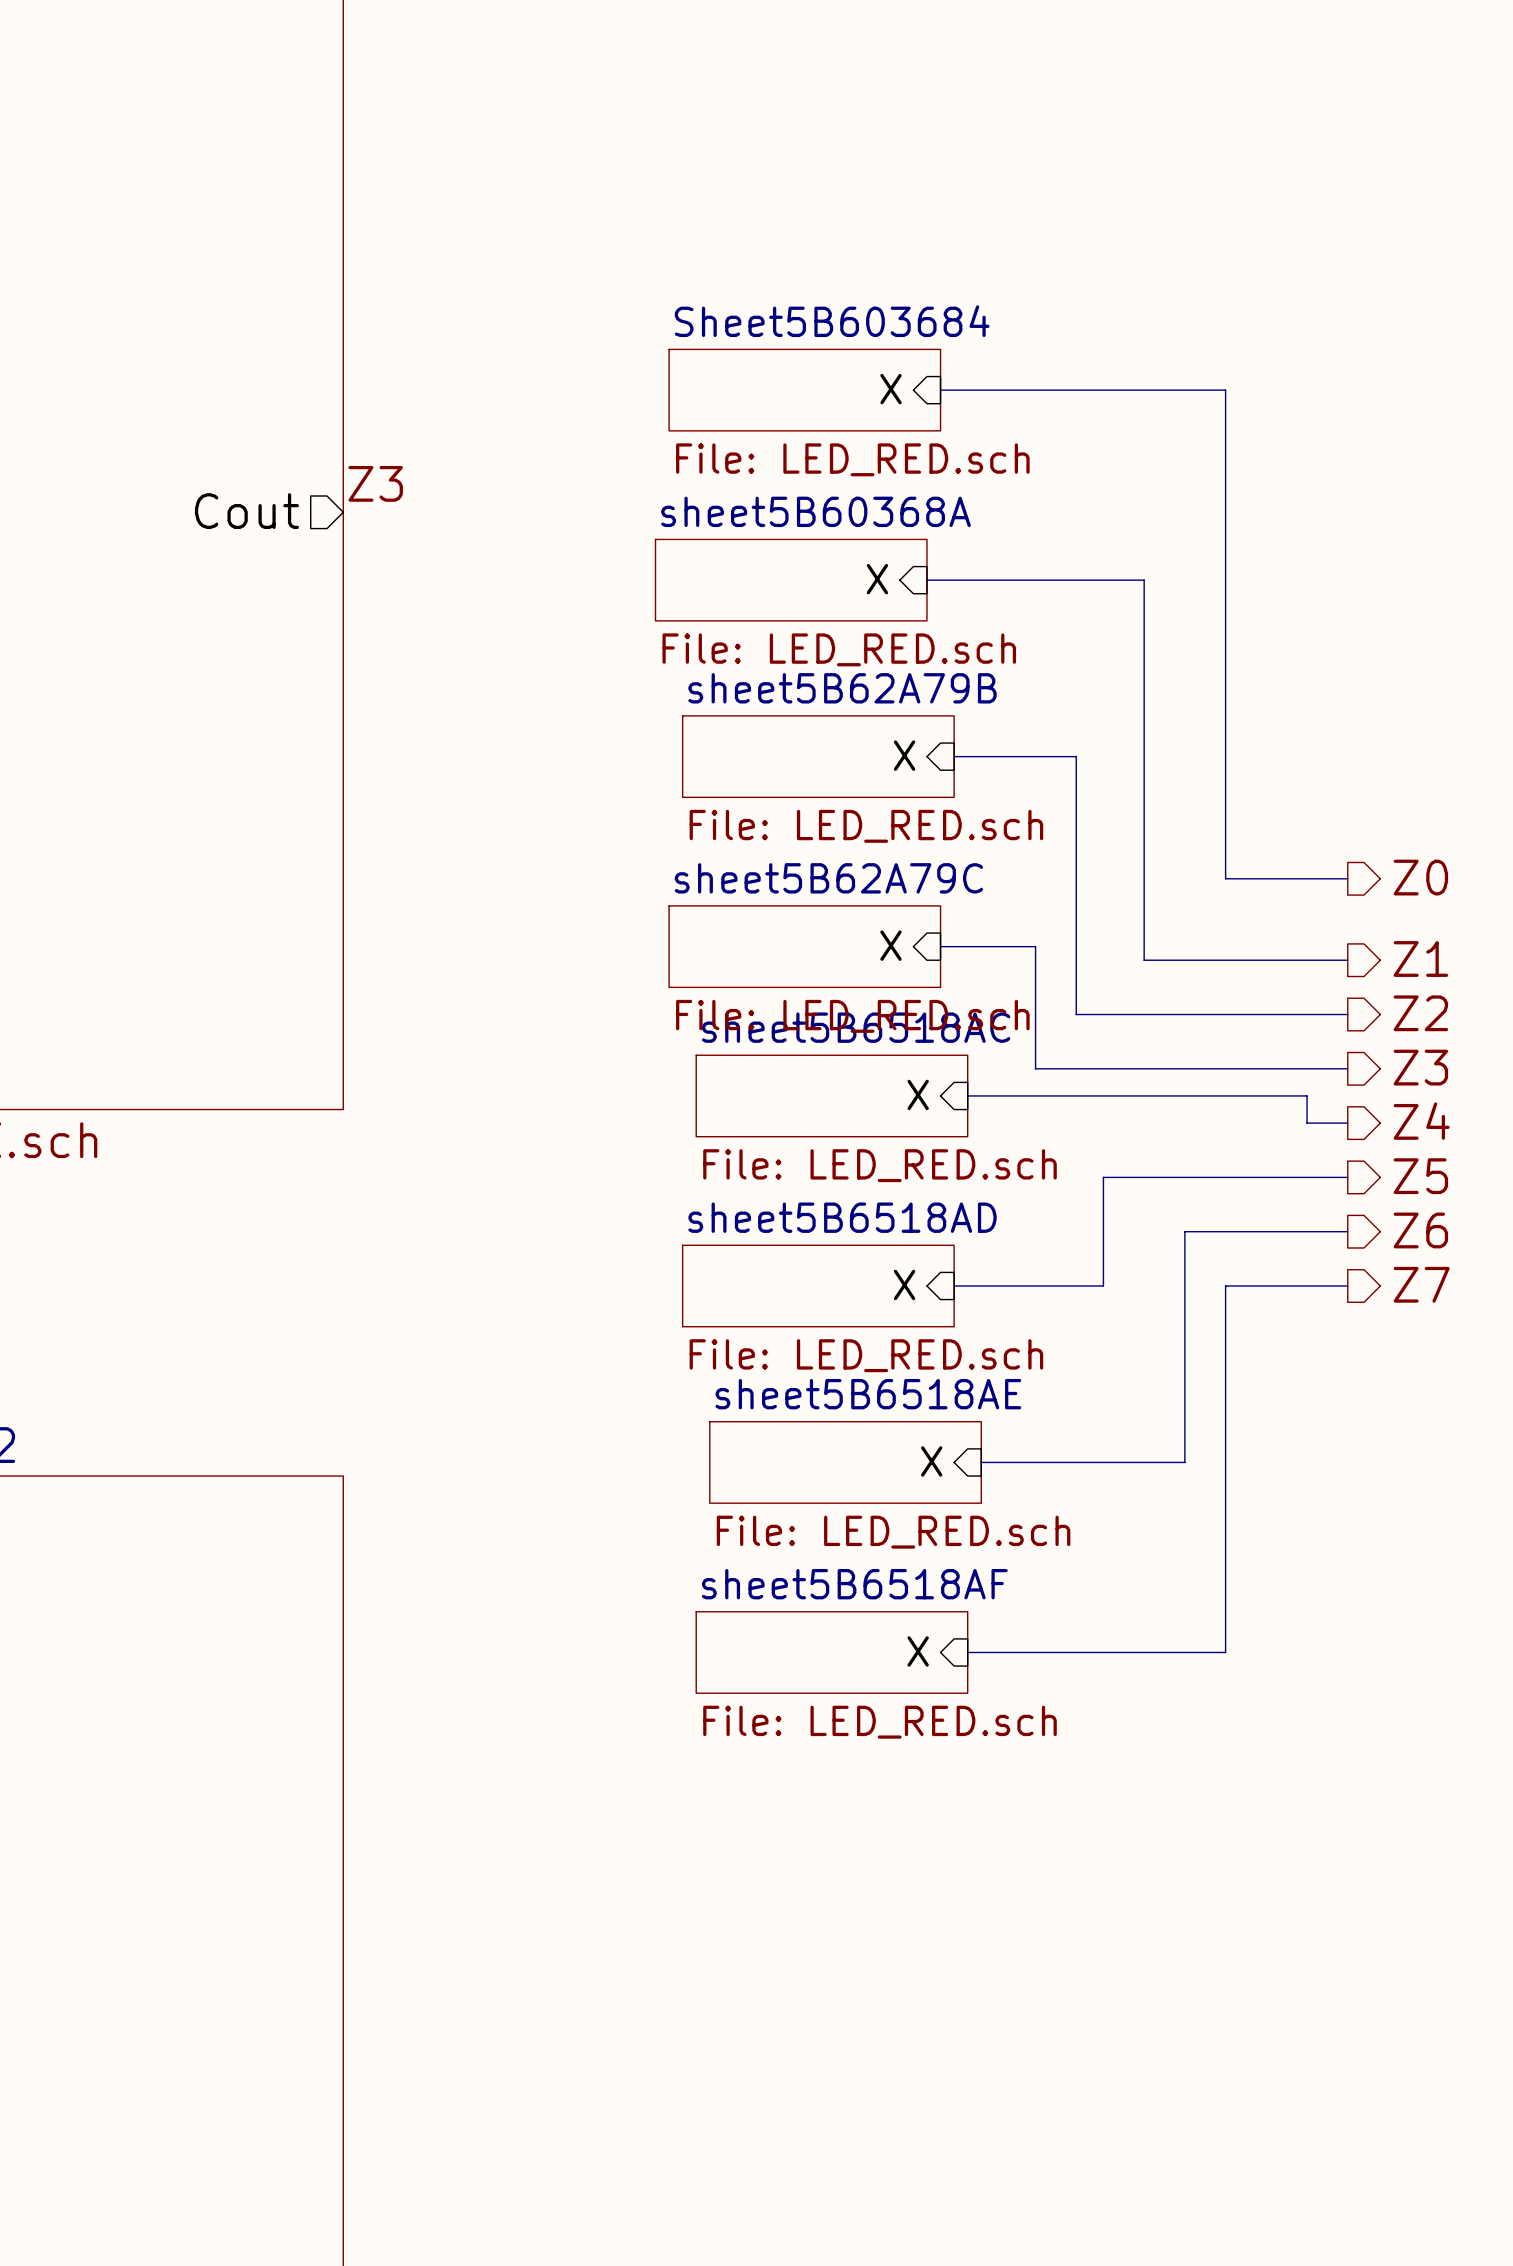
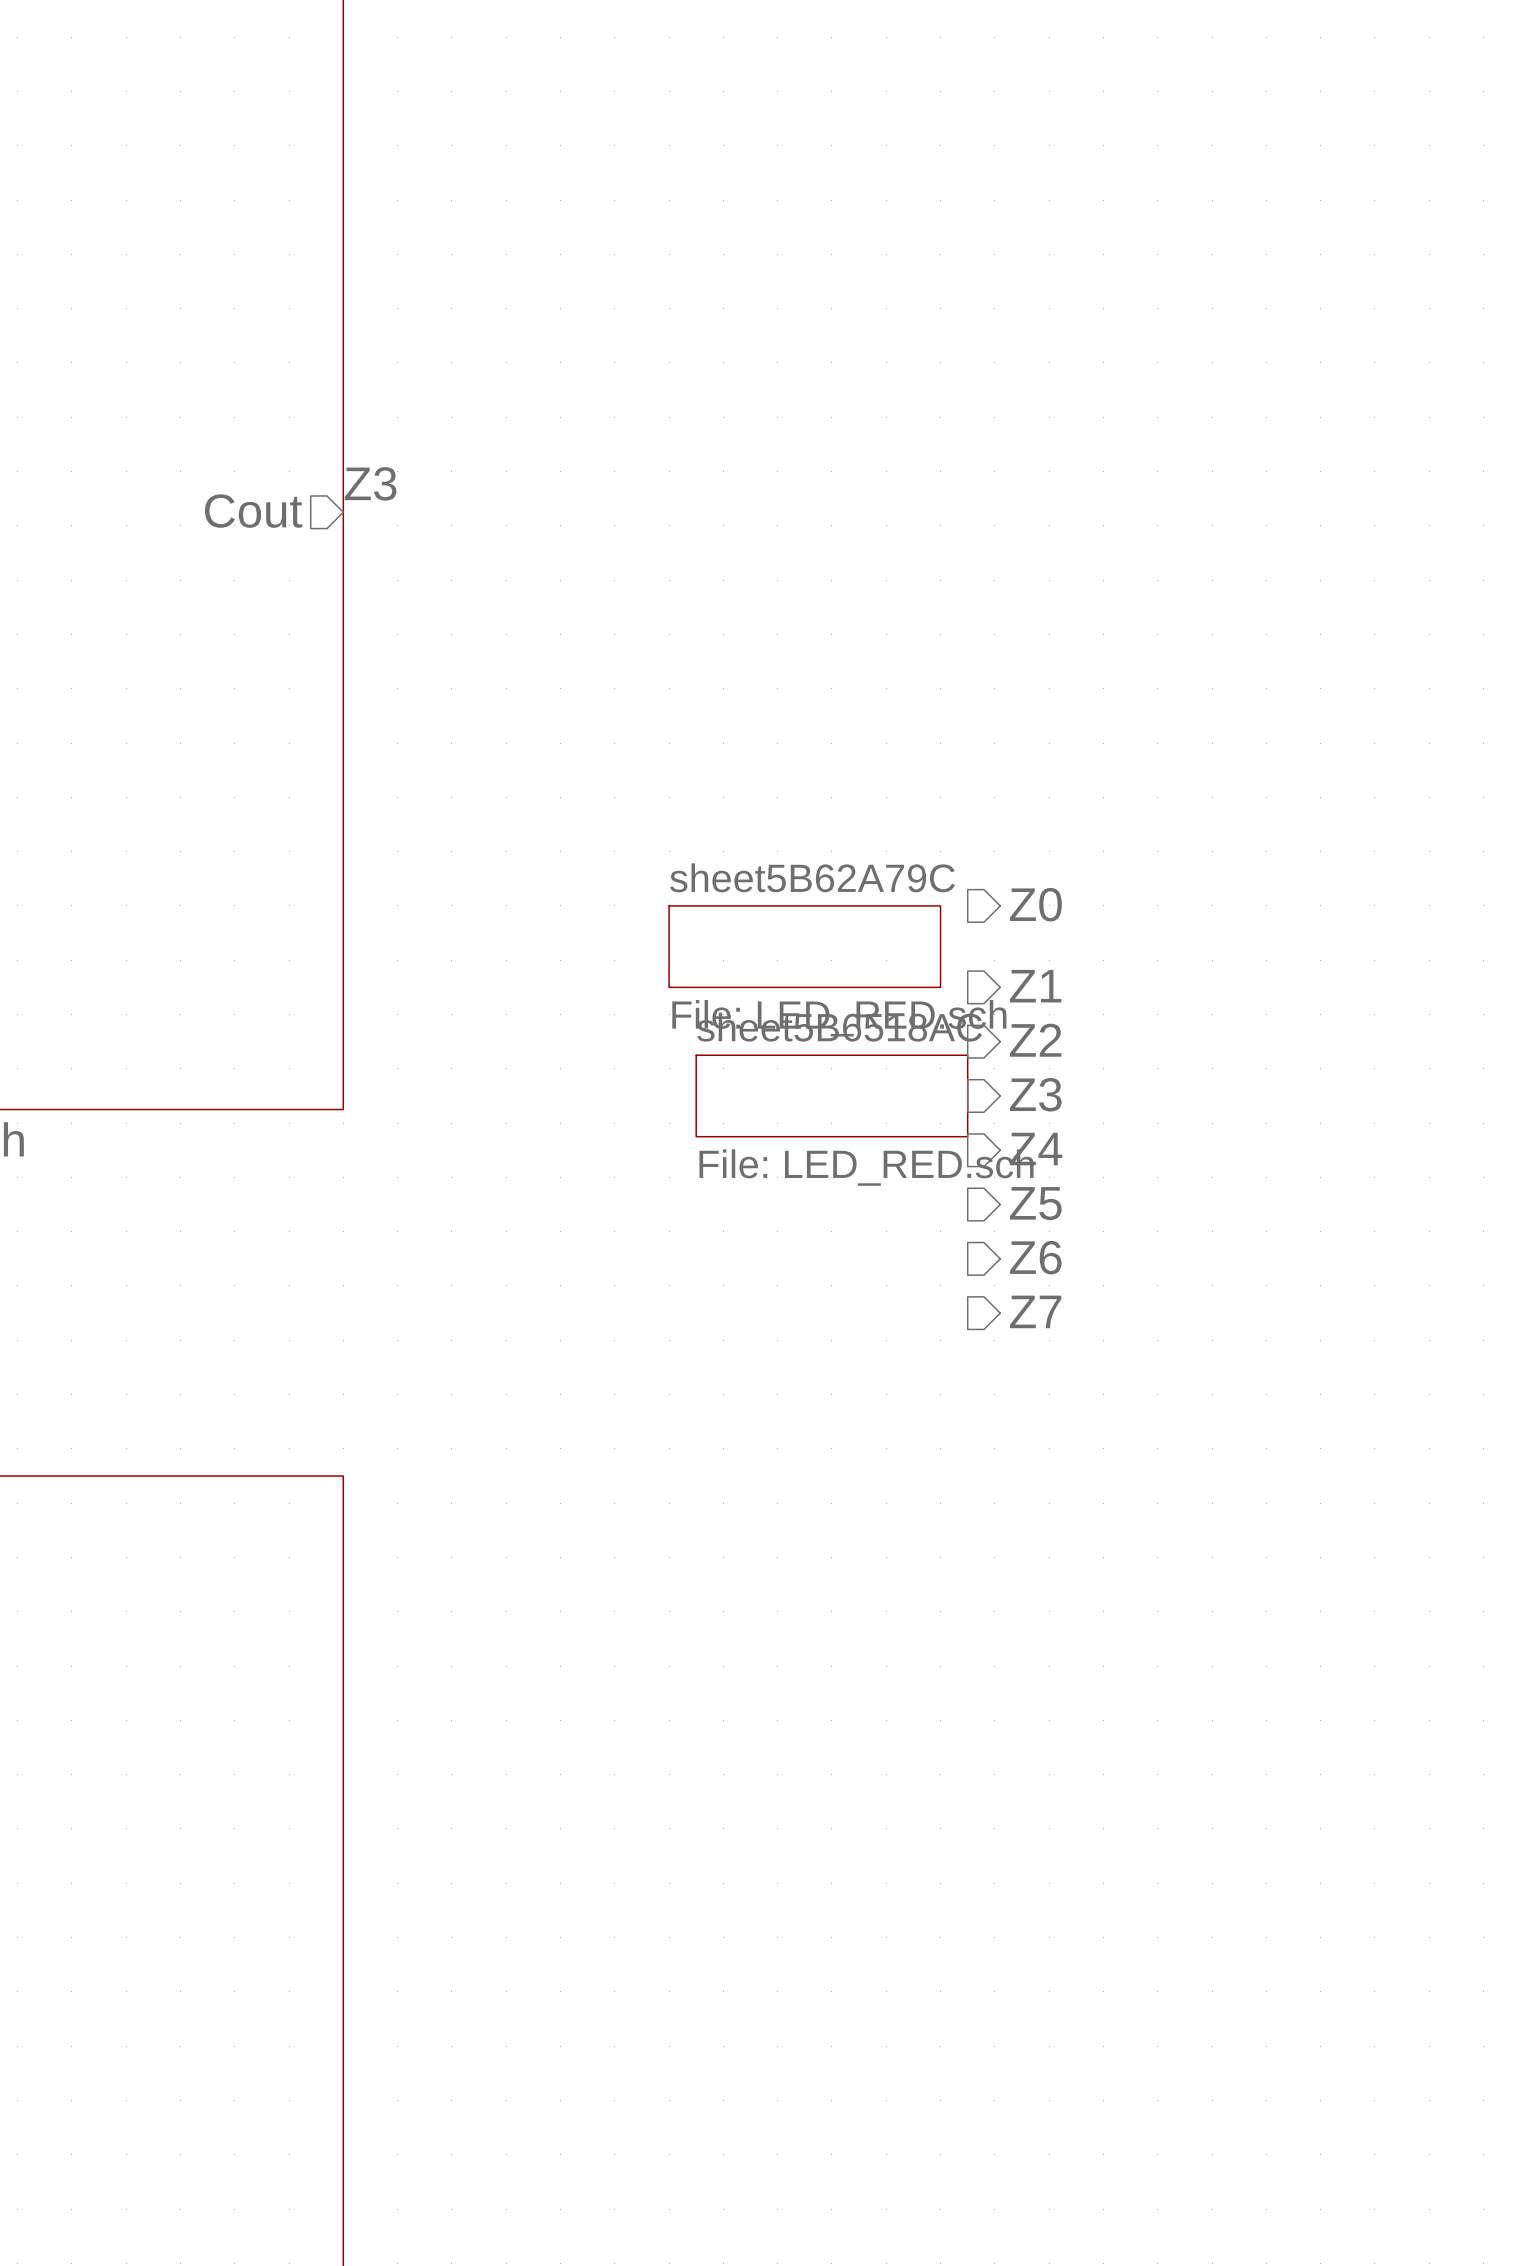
sheet pin: X (891, 389) -> none
sheet Sheet5B603684: File: LED_RED.sch (804, 390) -> none
wire: (940, 390) (1225, 390) (1225, 878) (1347, 878) -> none
sheet pin: X (877, 579) -> none
sheet sheet5B60368A: File: LED_RED.sch (791, 580) -> none
wire: (926, 580) (1144, 580) (1144, 960) (1347, 960) -> none
sheet pin: X (904, 755) -> none
sheet sheet5B62A79B: File: LED_RED.sch (818, 756) -> none
wire: (954, 756) (1076, 756) (1076, 1014) (1347, 1014) -> none
hierarchical label position: Z0 (1420, 877) -> Z0 (1035, 904)
sheet pin: X (891, 945) -> none
wire: (940, 946) (1035, 946) (1035, 1068) (1347, 1068) -> none
hierarchical label position: Z1 (1420, 959) -> Z1 (1035, 986)
hierarchical label position: Z2 (1420, 1013) -> Z2 (1035, 1040)
hierarchical label position: Z3 (1420, 1067) -> Z3 (1035, 1094)
sheet pin: X (918, 1094) -> none
wire: (967, 1095) (1307, 1095) (1307, 1123) (1347, 1123) -> none
hierarchical label position: Z4 (1421, 1121) -> Z4 (1036, 1149)
hierarchical label position: Z5 (1420, 1176) -> Z5 (1035, 1203)
wire: (1347, 1177) (1103, 1177) (1103, 1285) (954, 1285) -> none
hierarchical label position: Z6 (1420, 1230) -> Z6 (1035, 1257)
wire: (1347, 1231) (1184, 1231) (1184, 1462) (981, 1462) -> none
sheet pin: X (904, 1284) -> none
hierarchical label position: Z7 (1421, 1284) -> Z7 (1035, 1311)
sheet sheet5B6518AD: File: LED_RED.sch (818, 1285) -> none
wire: (1347, 1285) (1225, 1285) (1225, 1652) (967, 1652) -> none
sheet pin: X (931, 1461) -> none
sheet sheet5B6518AE: File: LED_RED.sch (845, 1462) -> none
sheet pin: X (918, 1651) -> none
sheet sheet5B6518AF: File: LED_RED.sch (831, 1652) -> none

